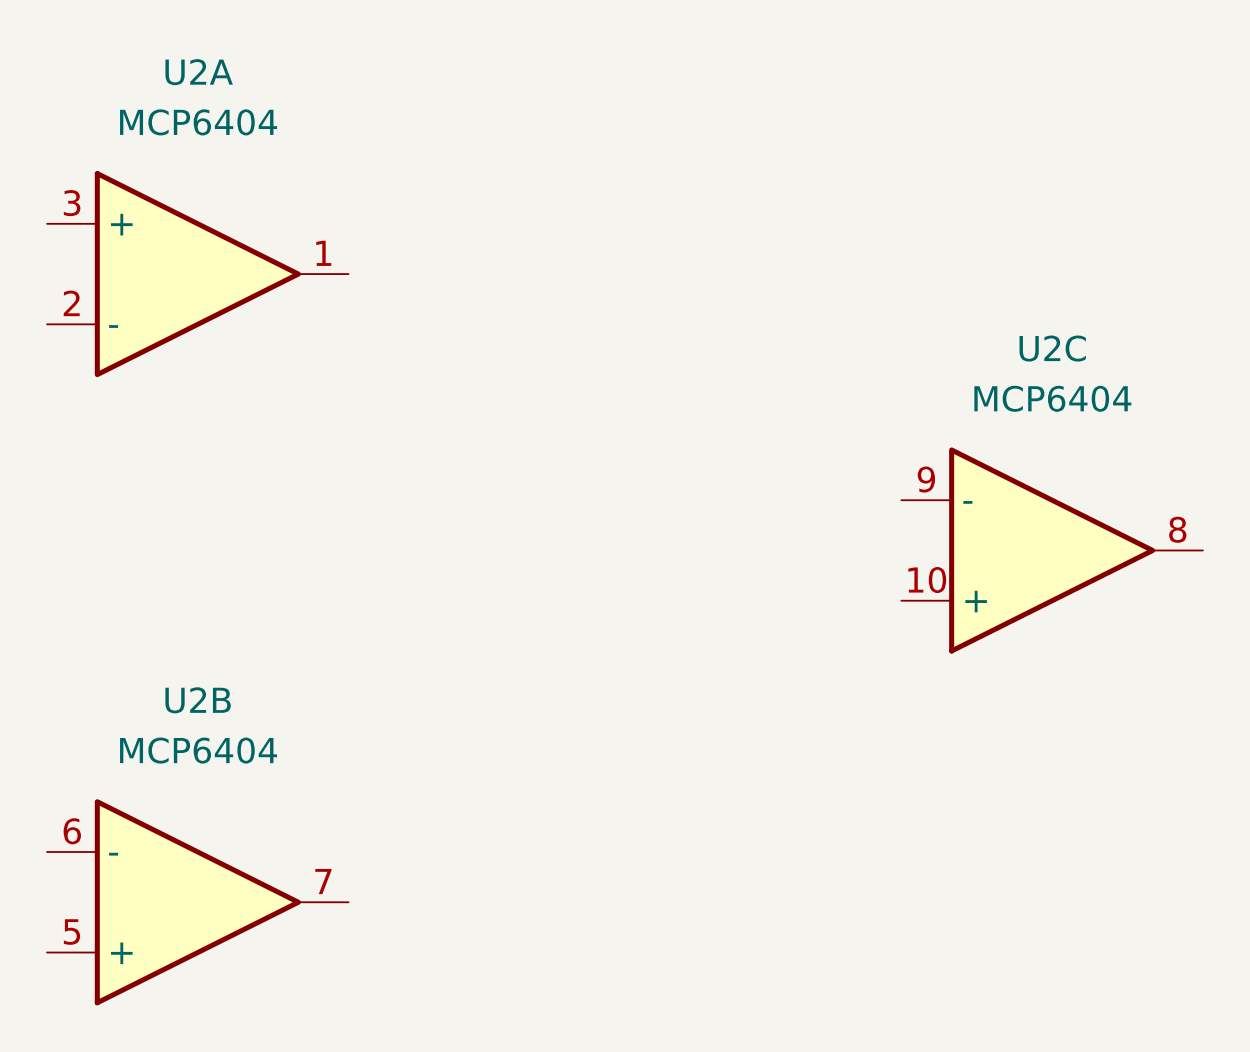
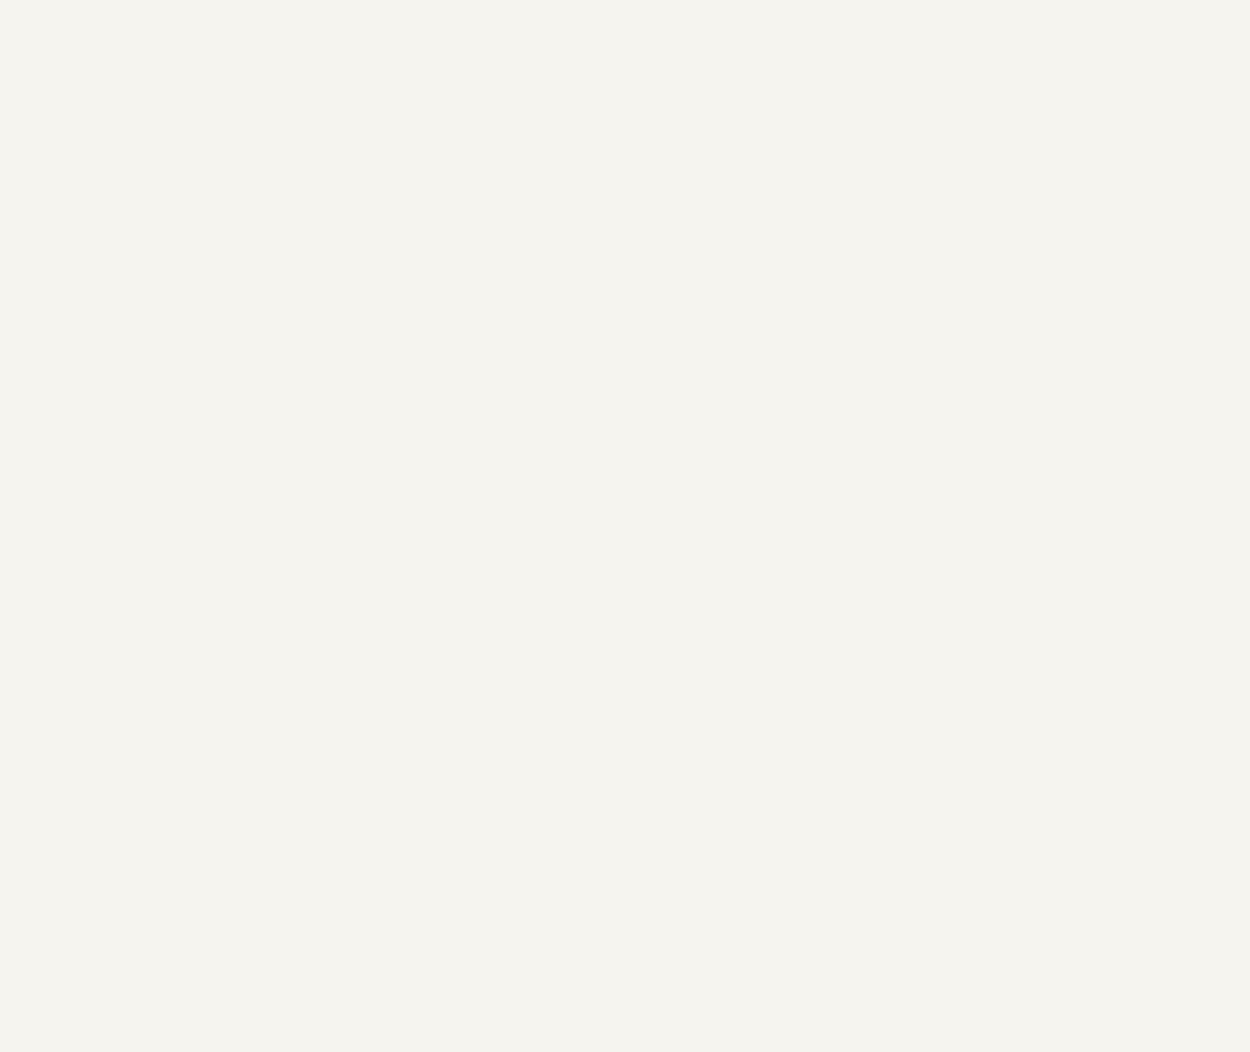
U2A: MCP6404 (197, 274) -> none
U2C: MCP6404 (1052, 550) -> none
U2B: MCP6404 (197, 902) -> none

